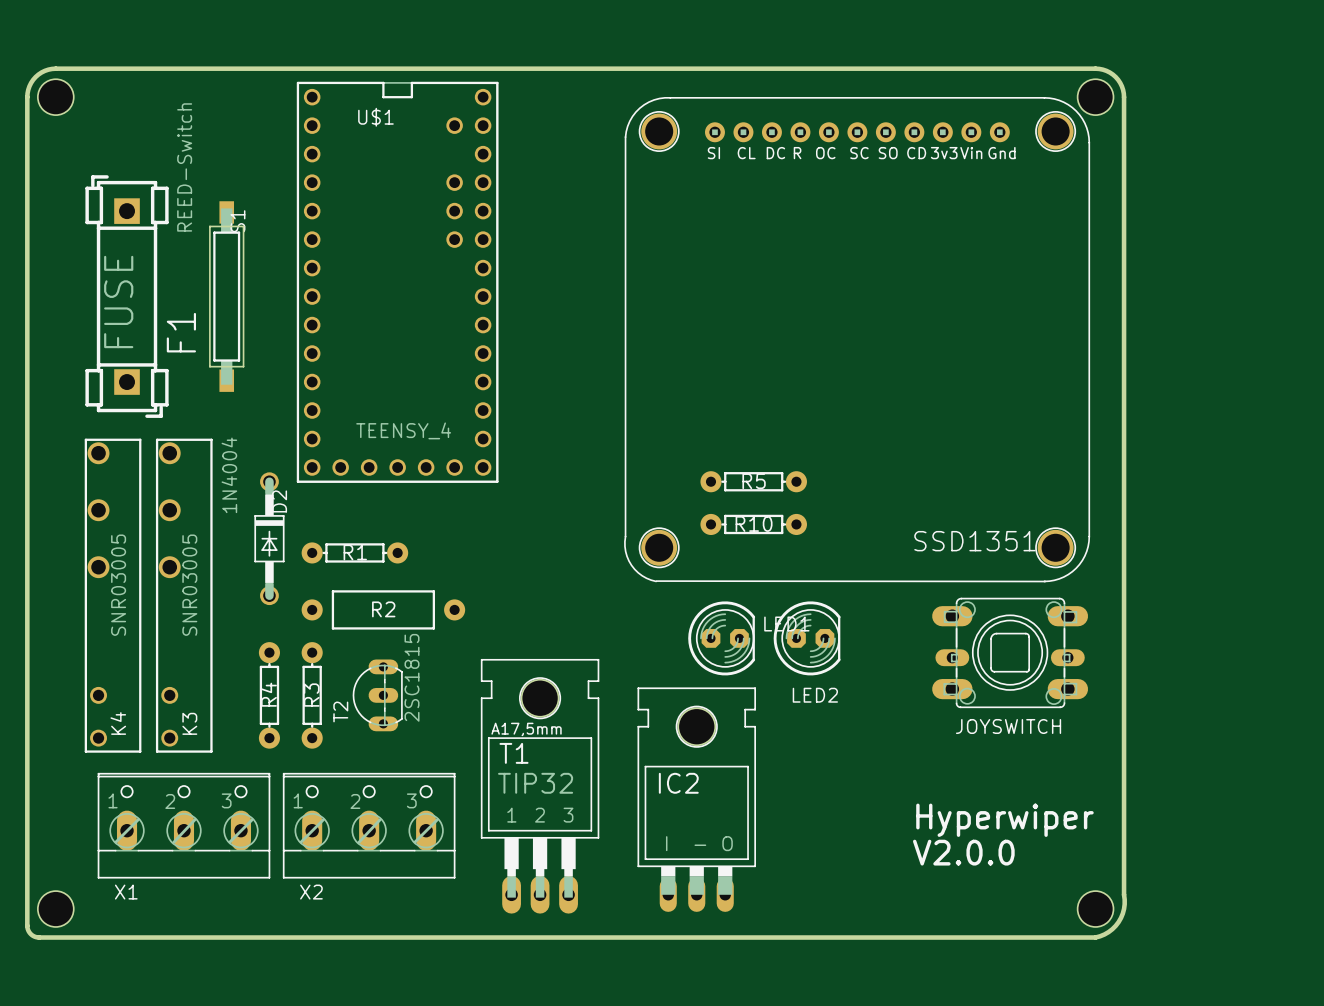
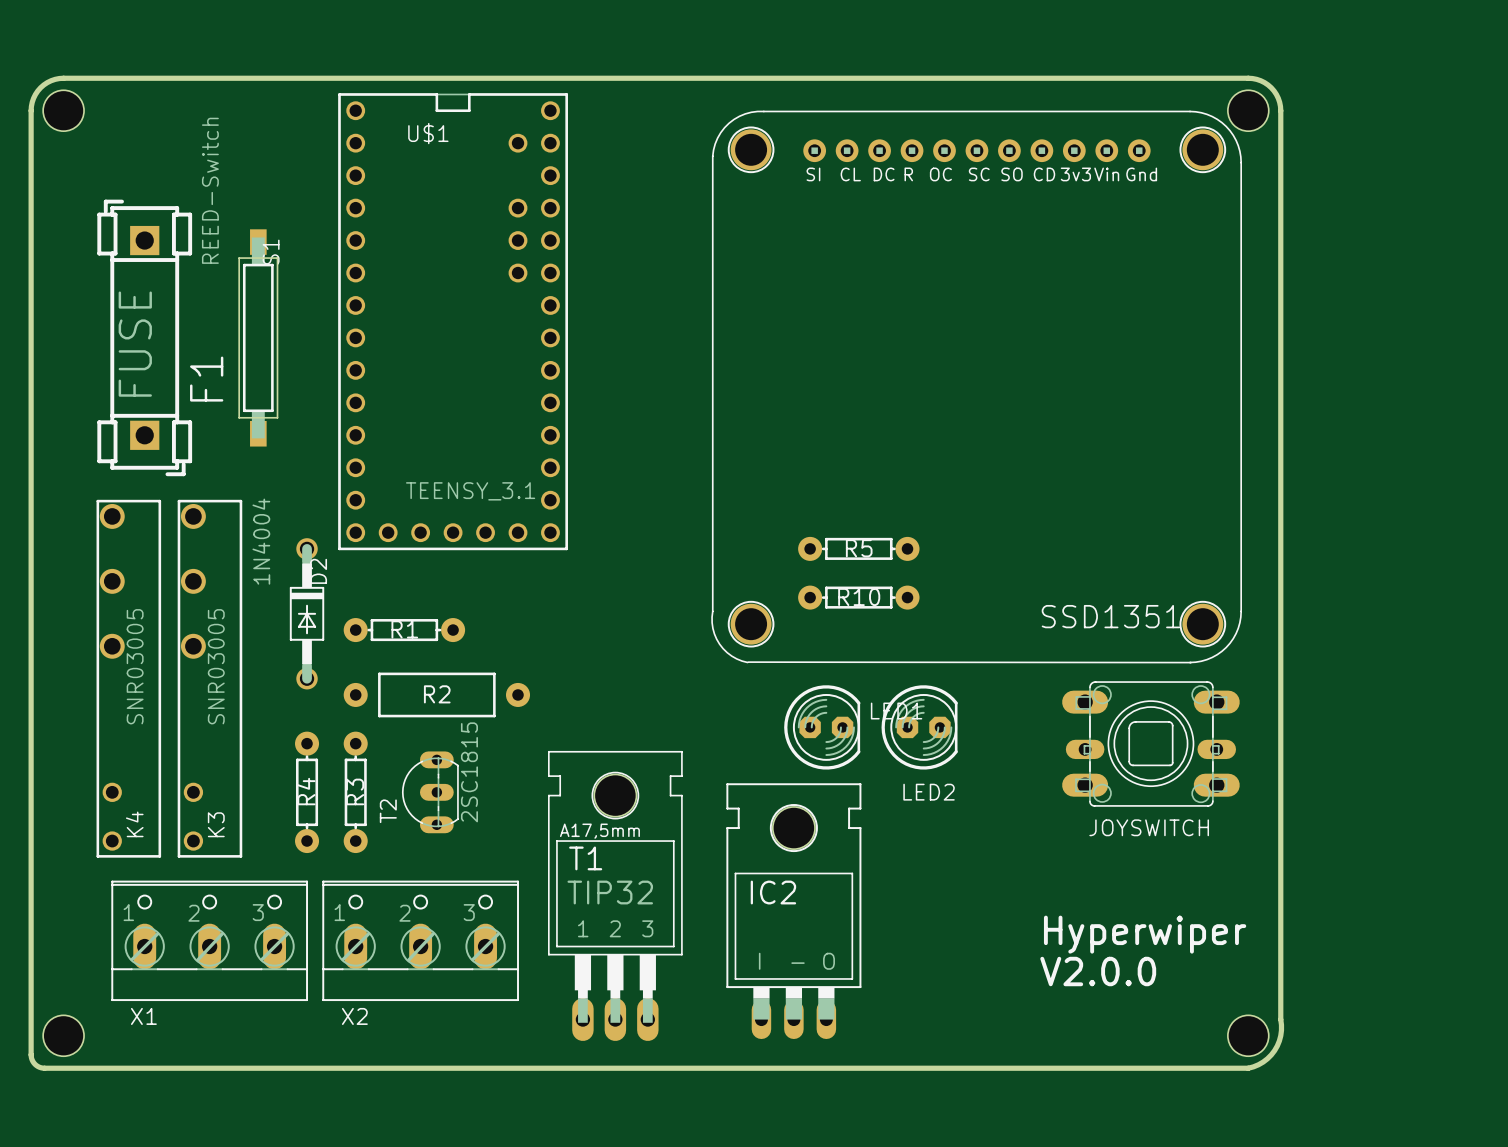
U$1 value: TEENSY_4 (403, 430) -> TEENSY_3.1 (470, 491)

